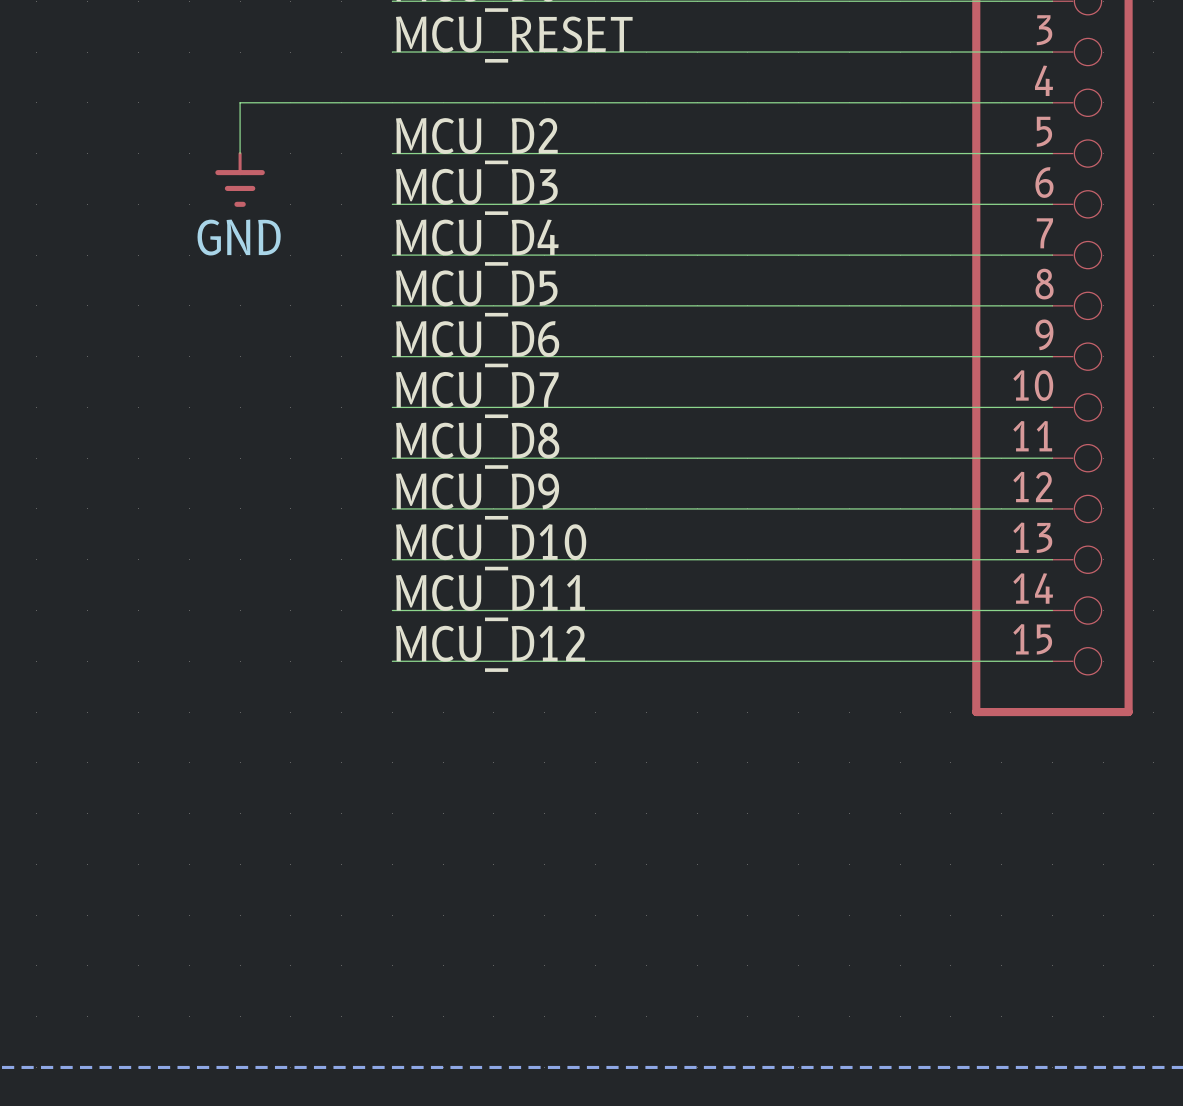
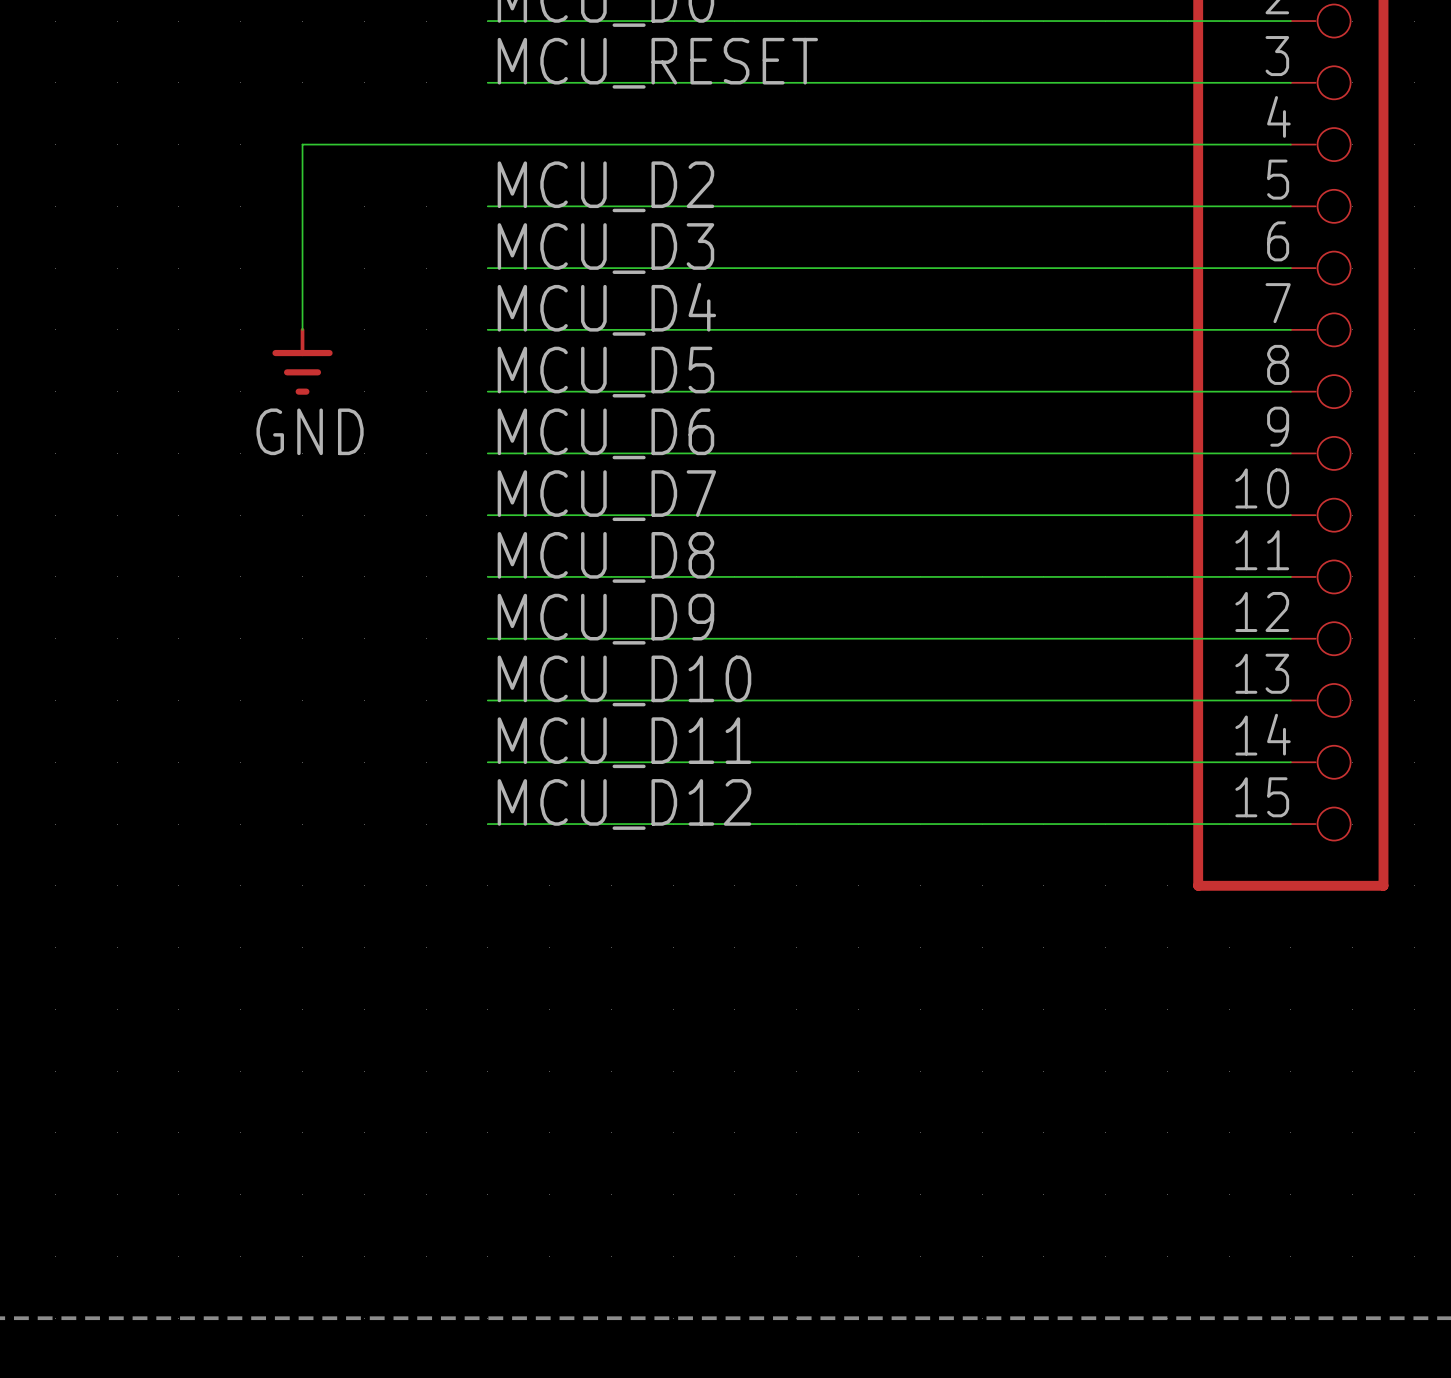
wire: none -> (302, 206) (302, 329)
power symbol position: GND (240, 179) -> GND (302, 361)

